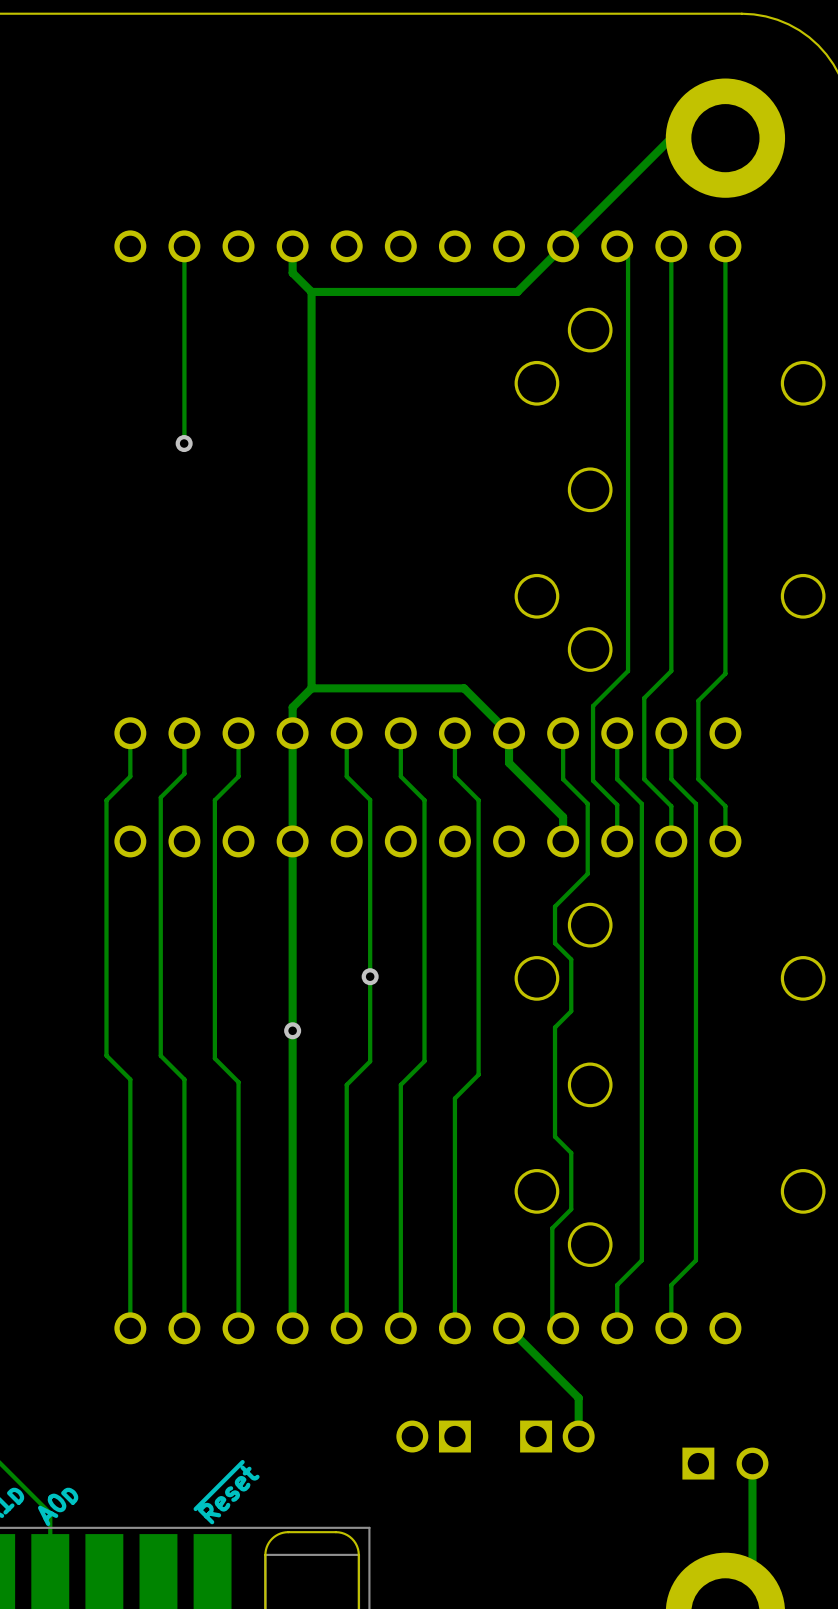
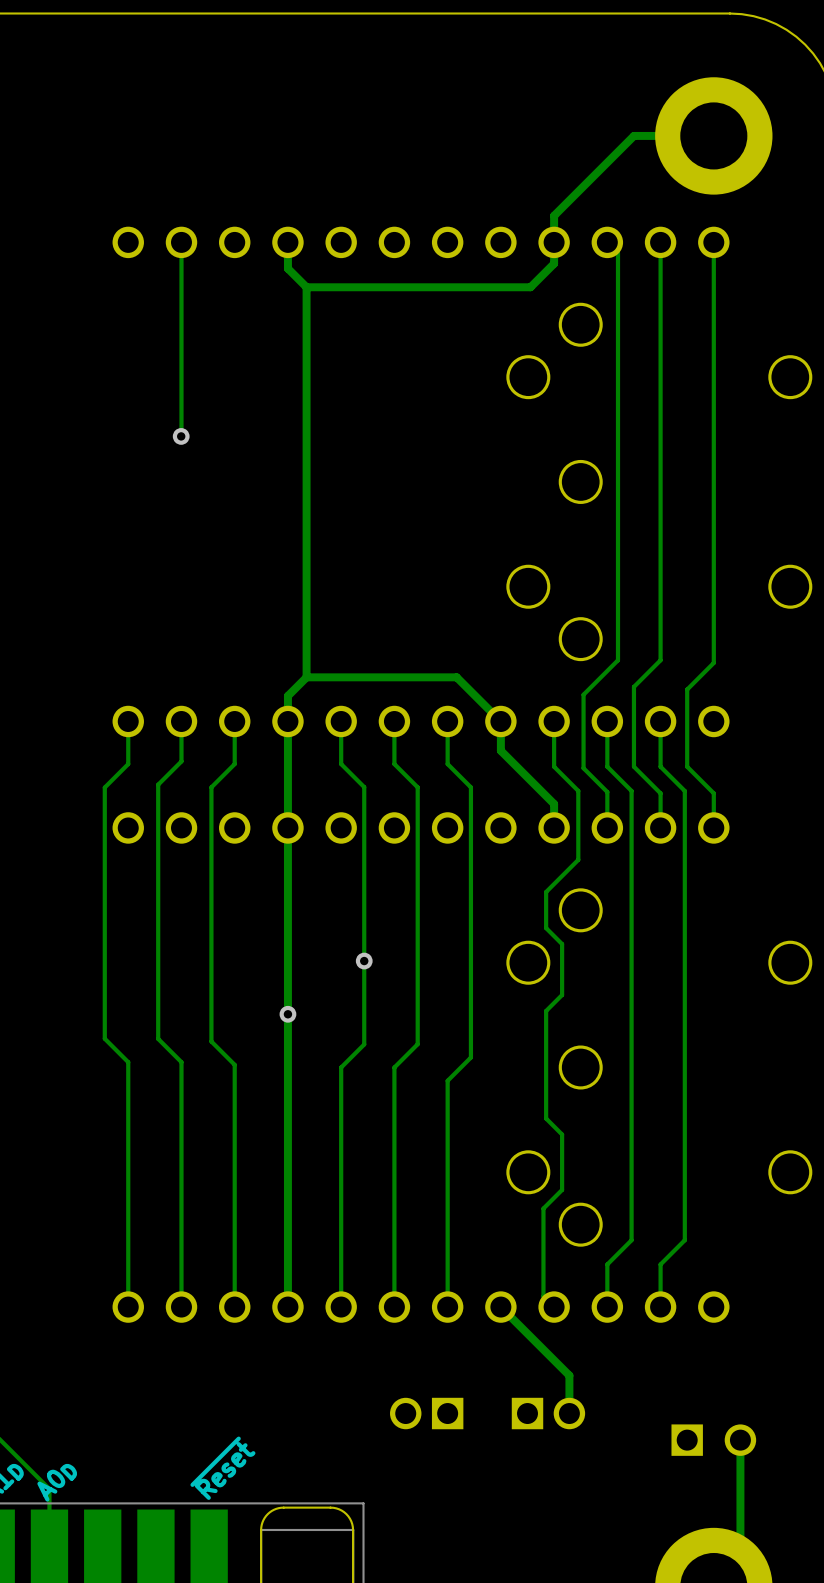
track: (671, 138) (517, 291) -> (713, 135) (633, 135) (554, 215) (554, 263) (530, 287) (509, 287)

